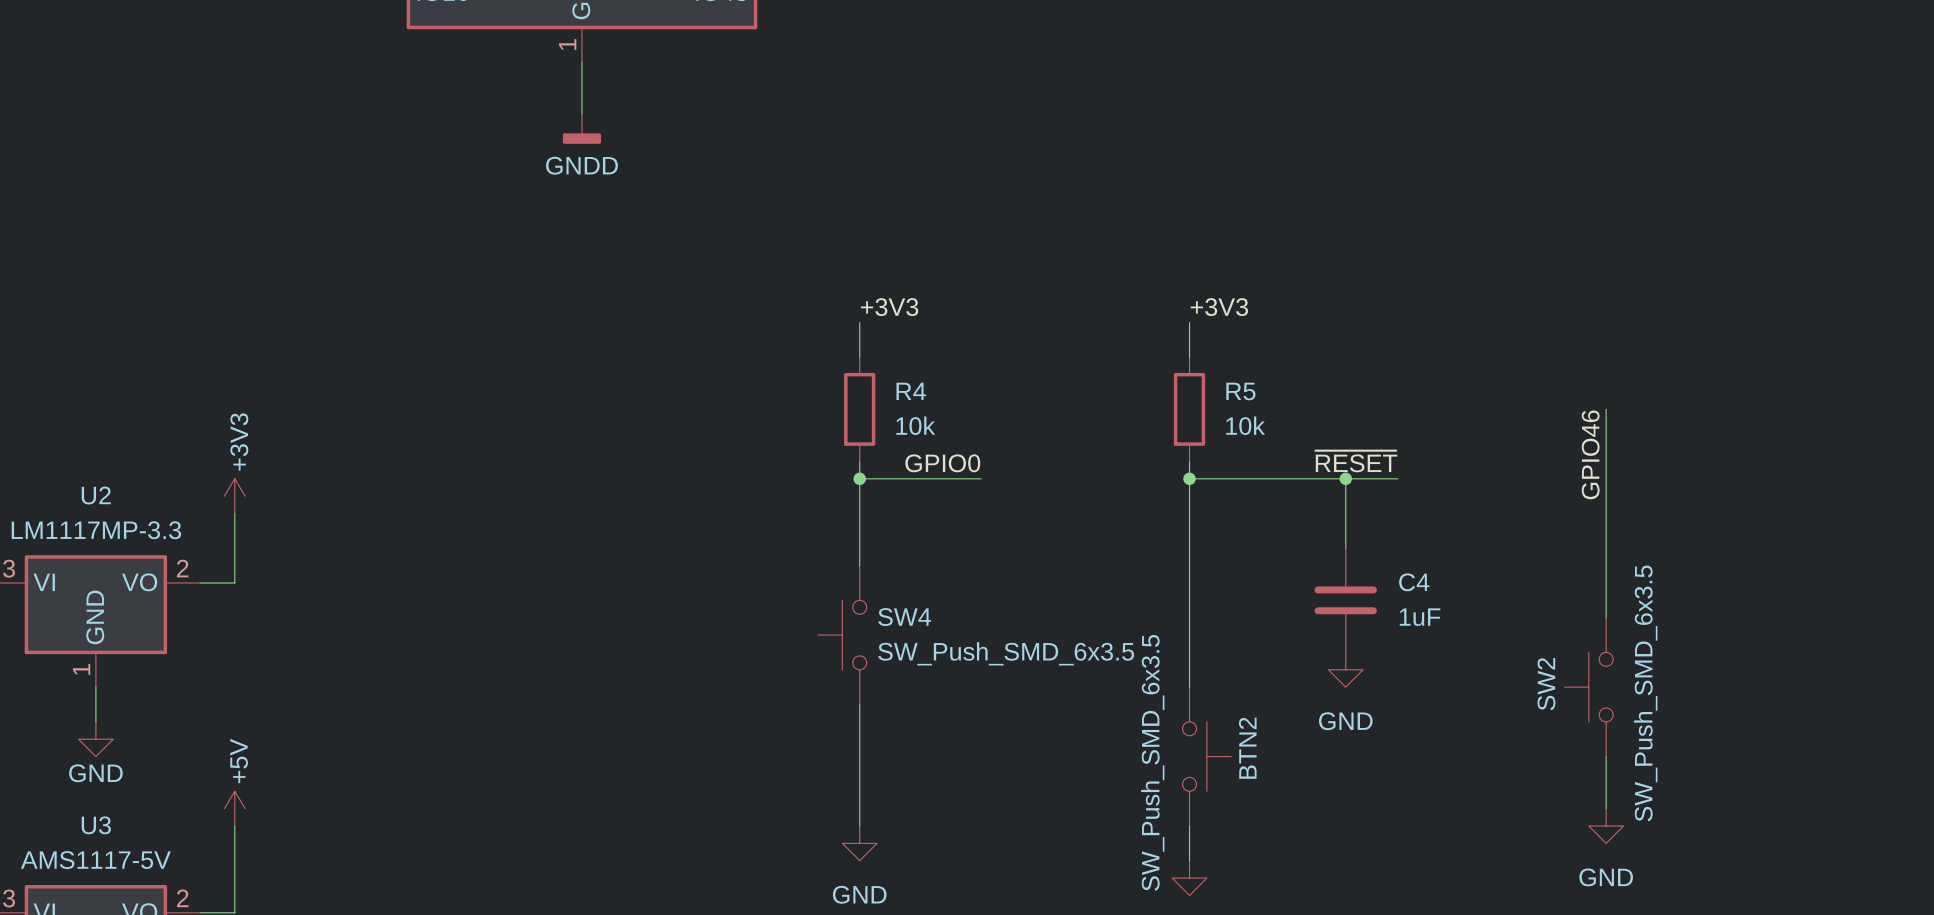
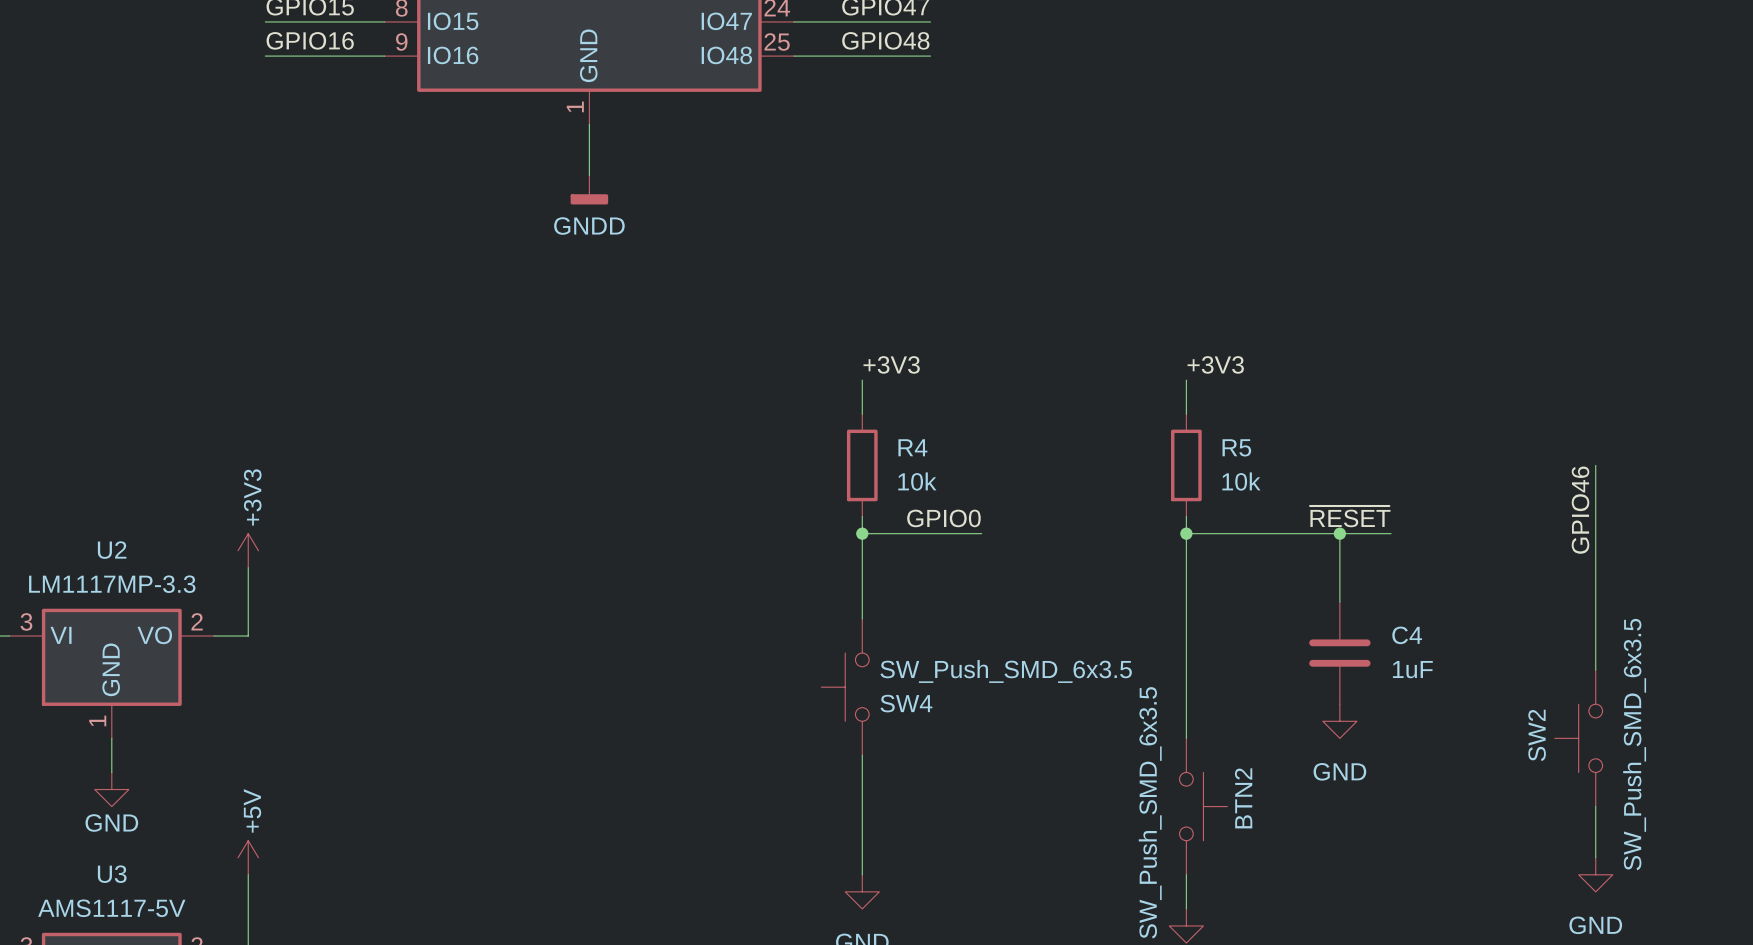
SW4 name position: SW4 (904, 617) -> SW4 (906, 703)
SW4 value position: SW_Push_SMD_6x3.5 (1006, 653) -> SW_Push_SMD_6x3.5 (1006, 671)

